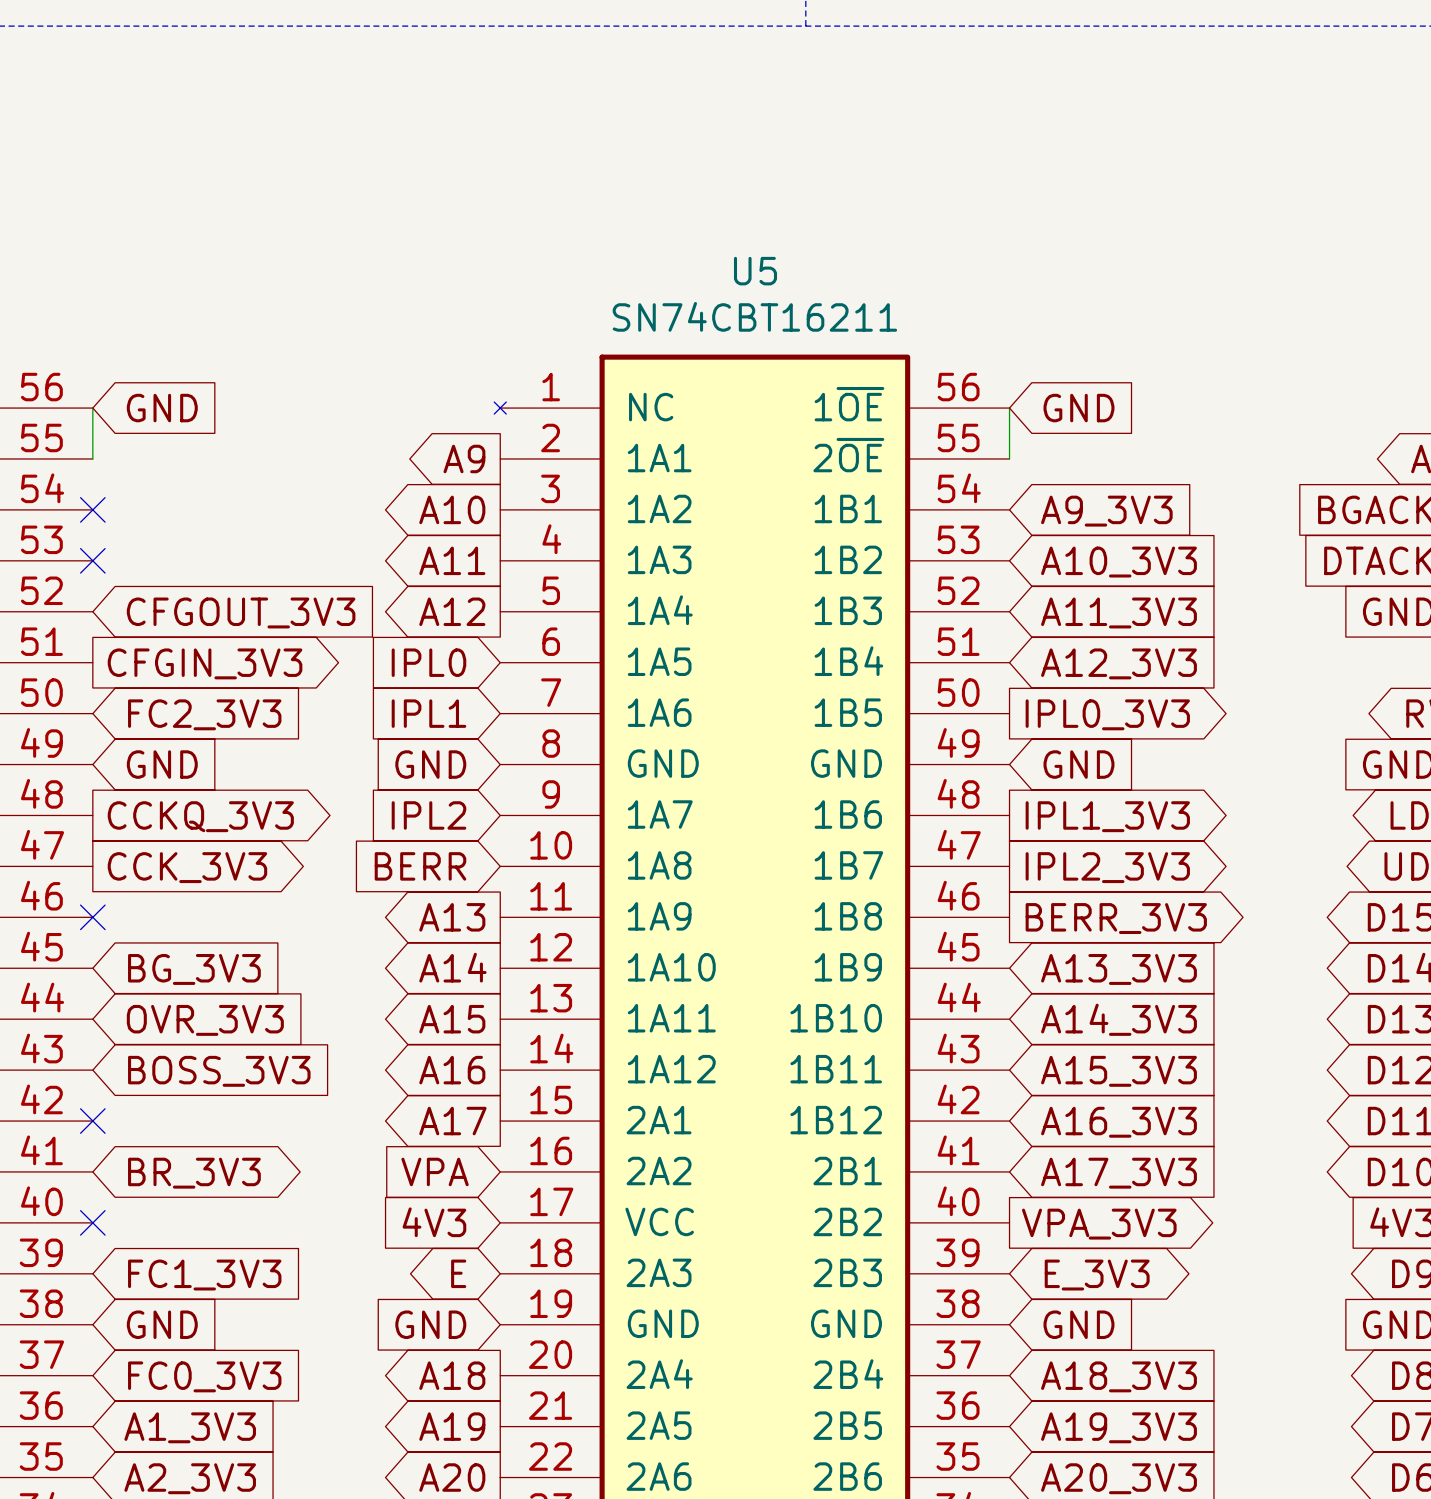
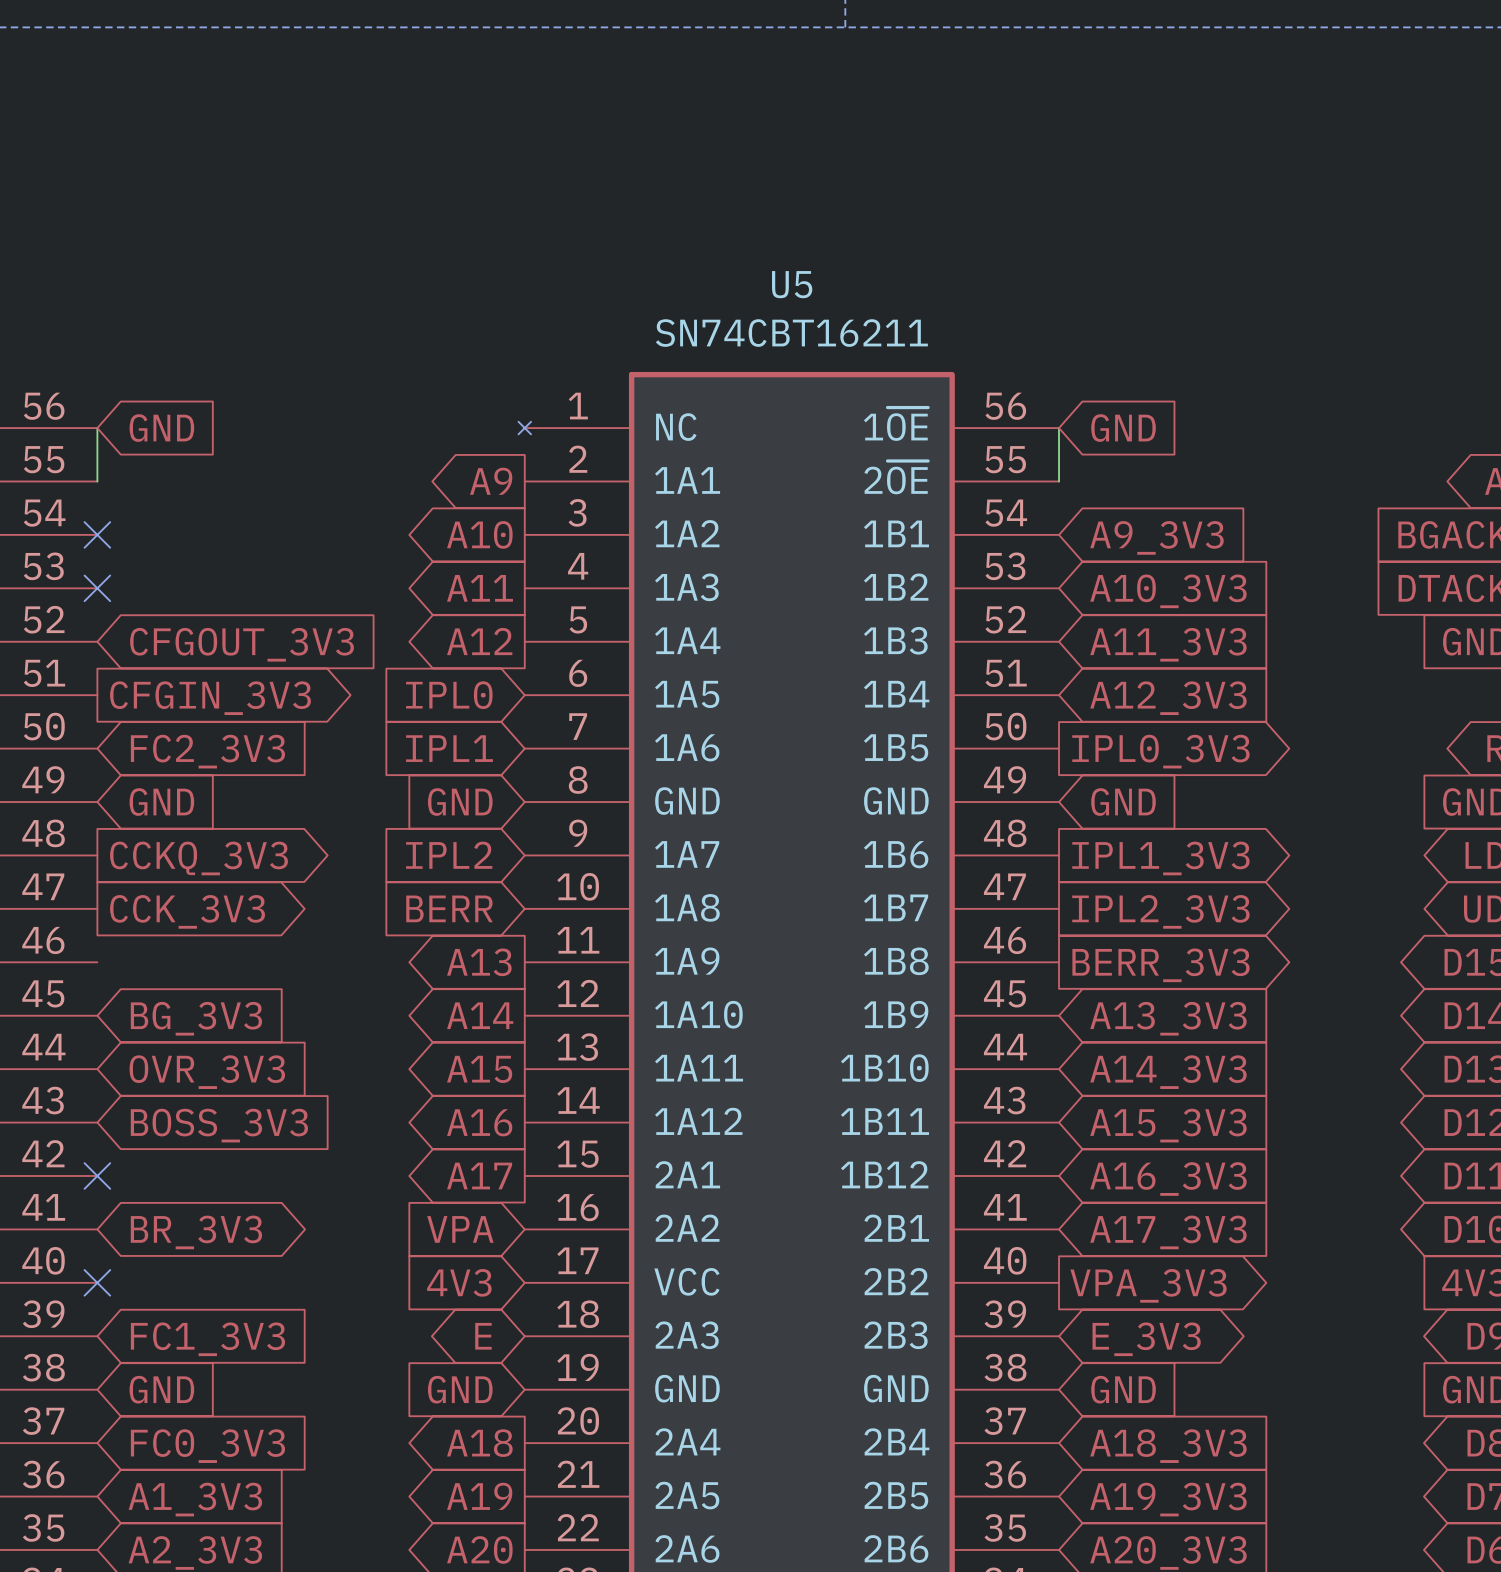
no-connect mark: (92, 917) -> none

